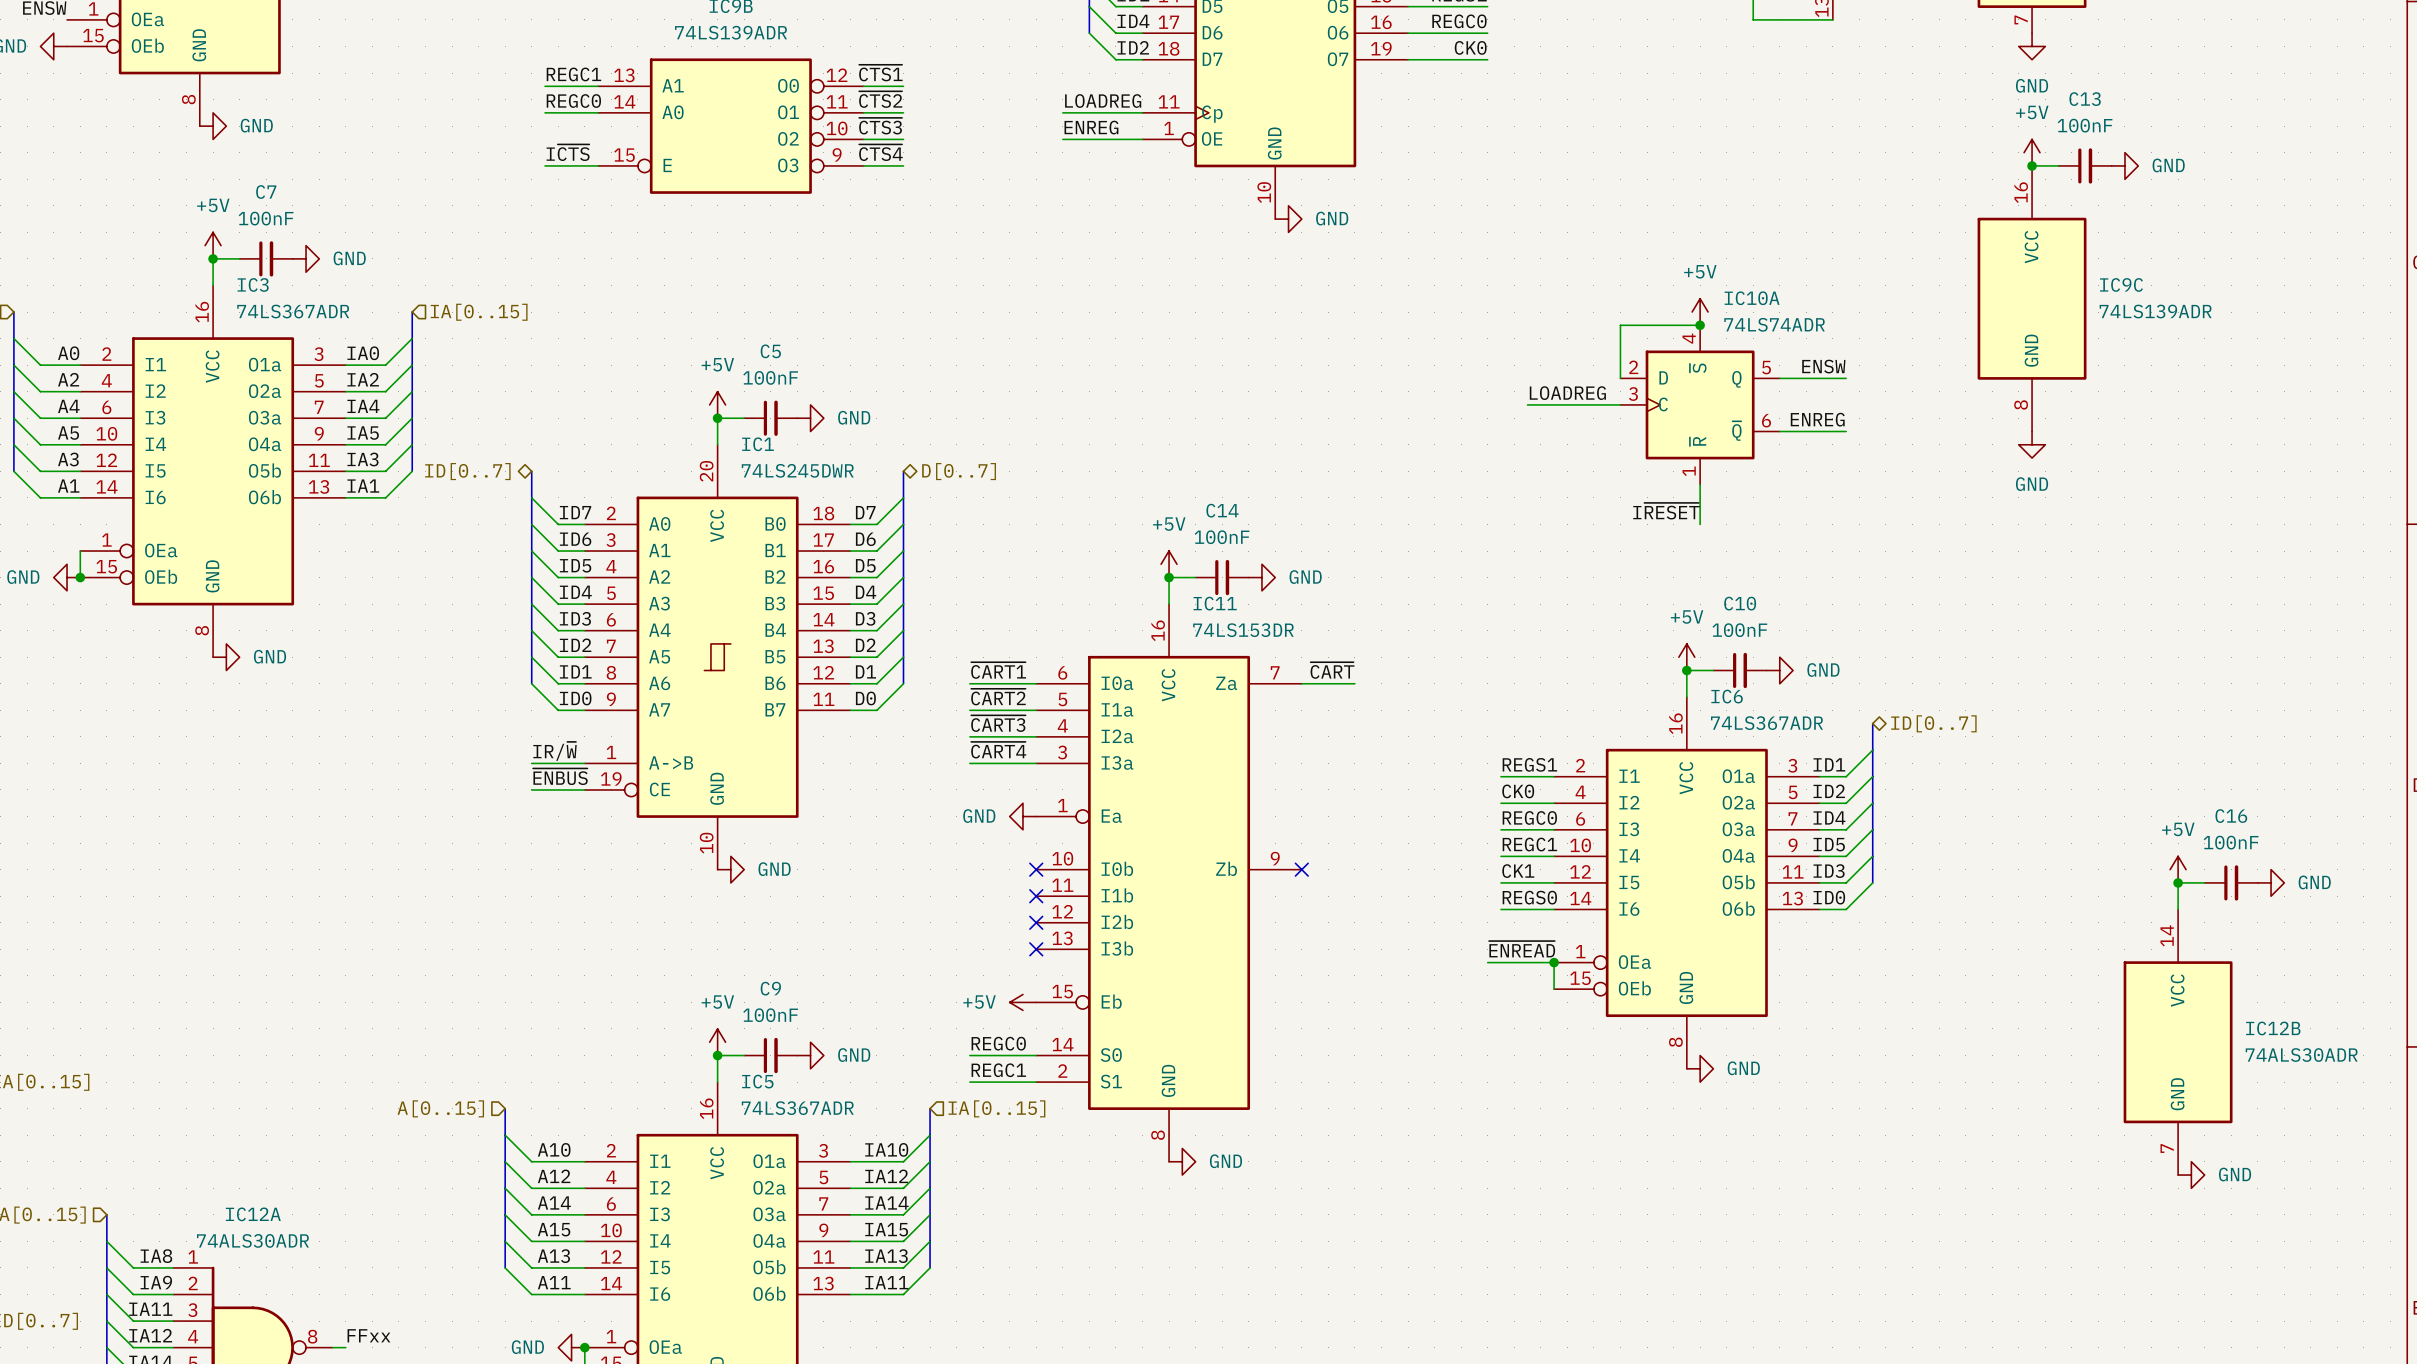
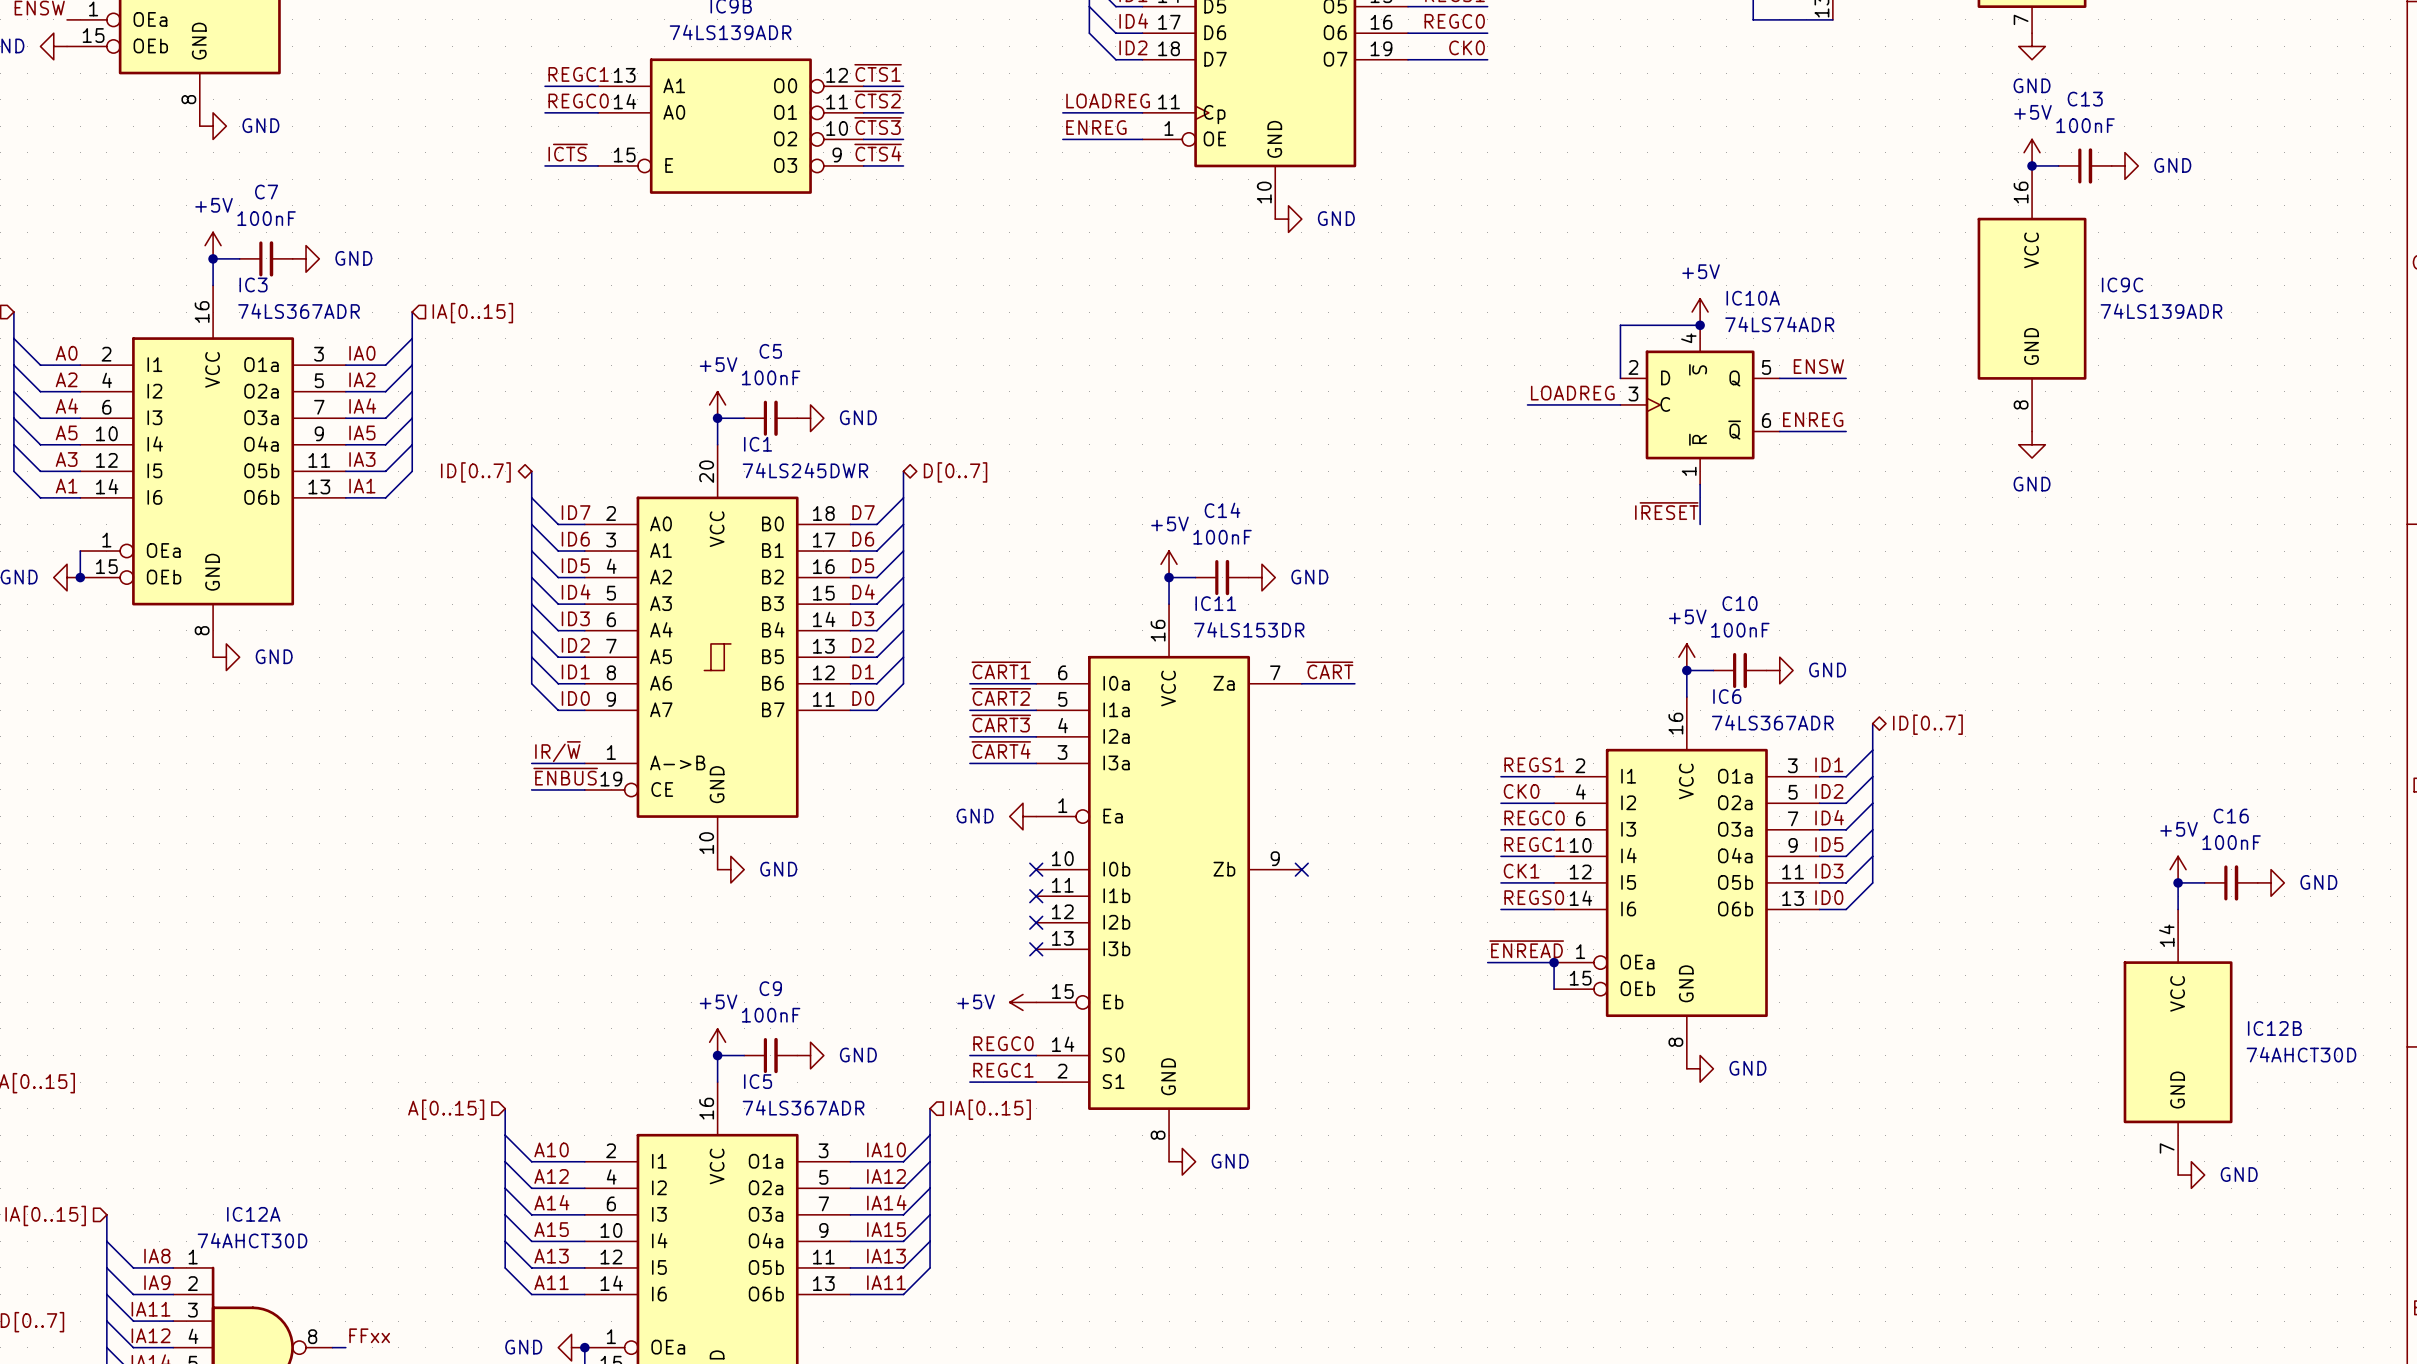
IC12B value: 74ALS30ADR (2301, 1055) -> 74AHCT30D (2301, 1054)
IC12A value: 74ALS30ADR (252, 1240) -> 74AHCT30D (252, 1240)

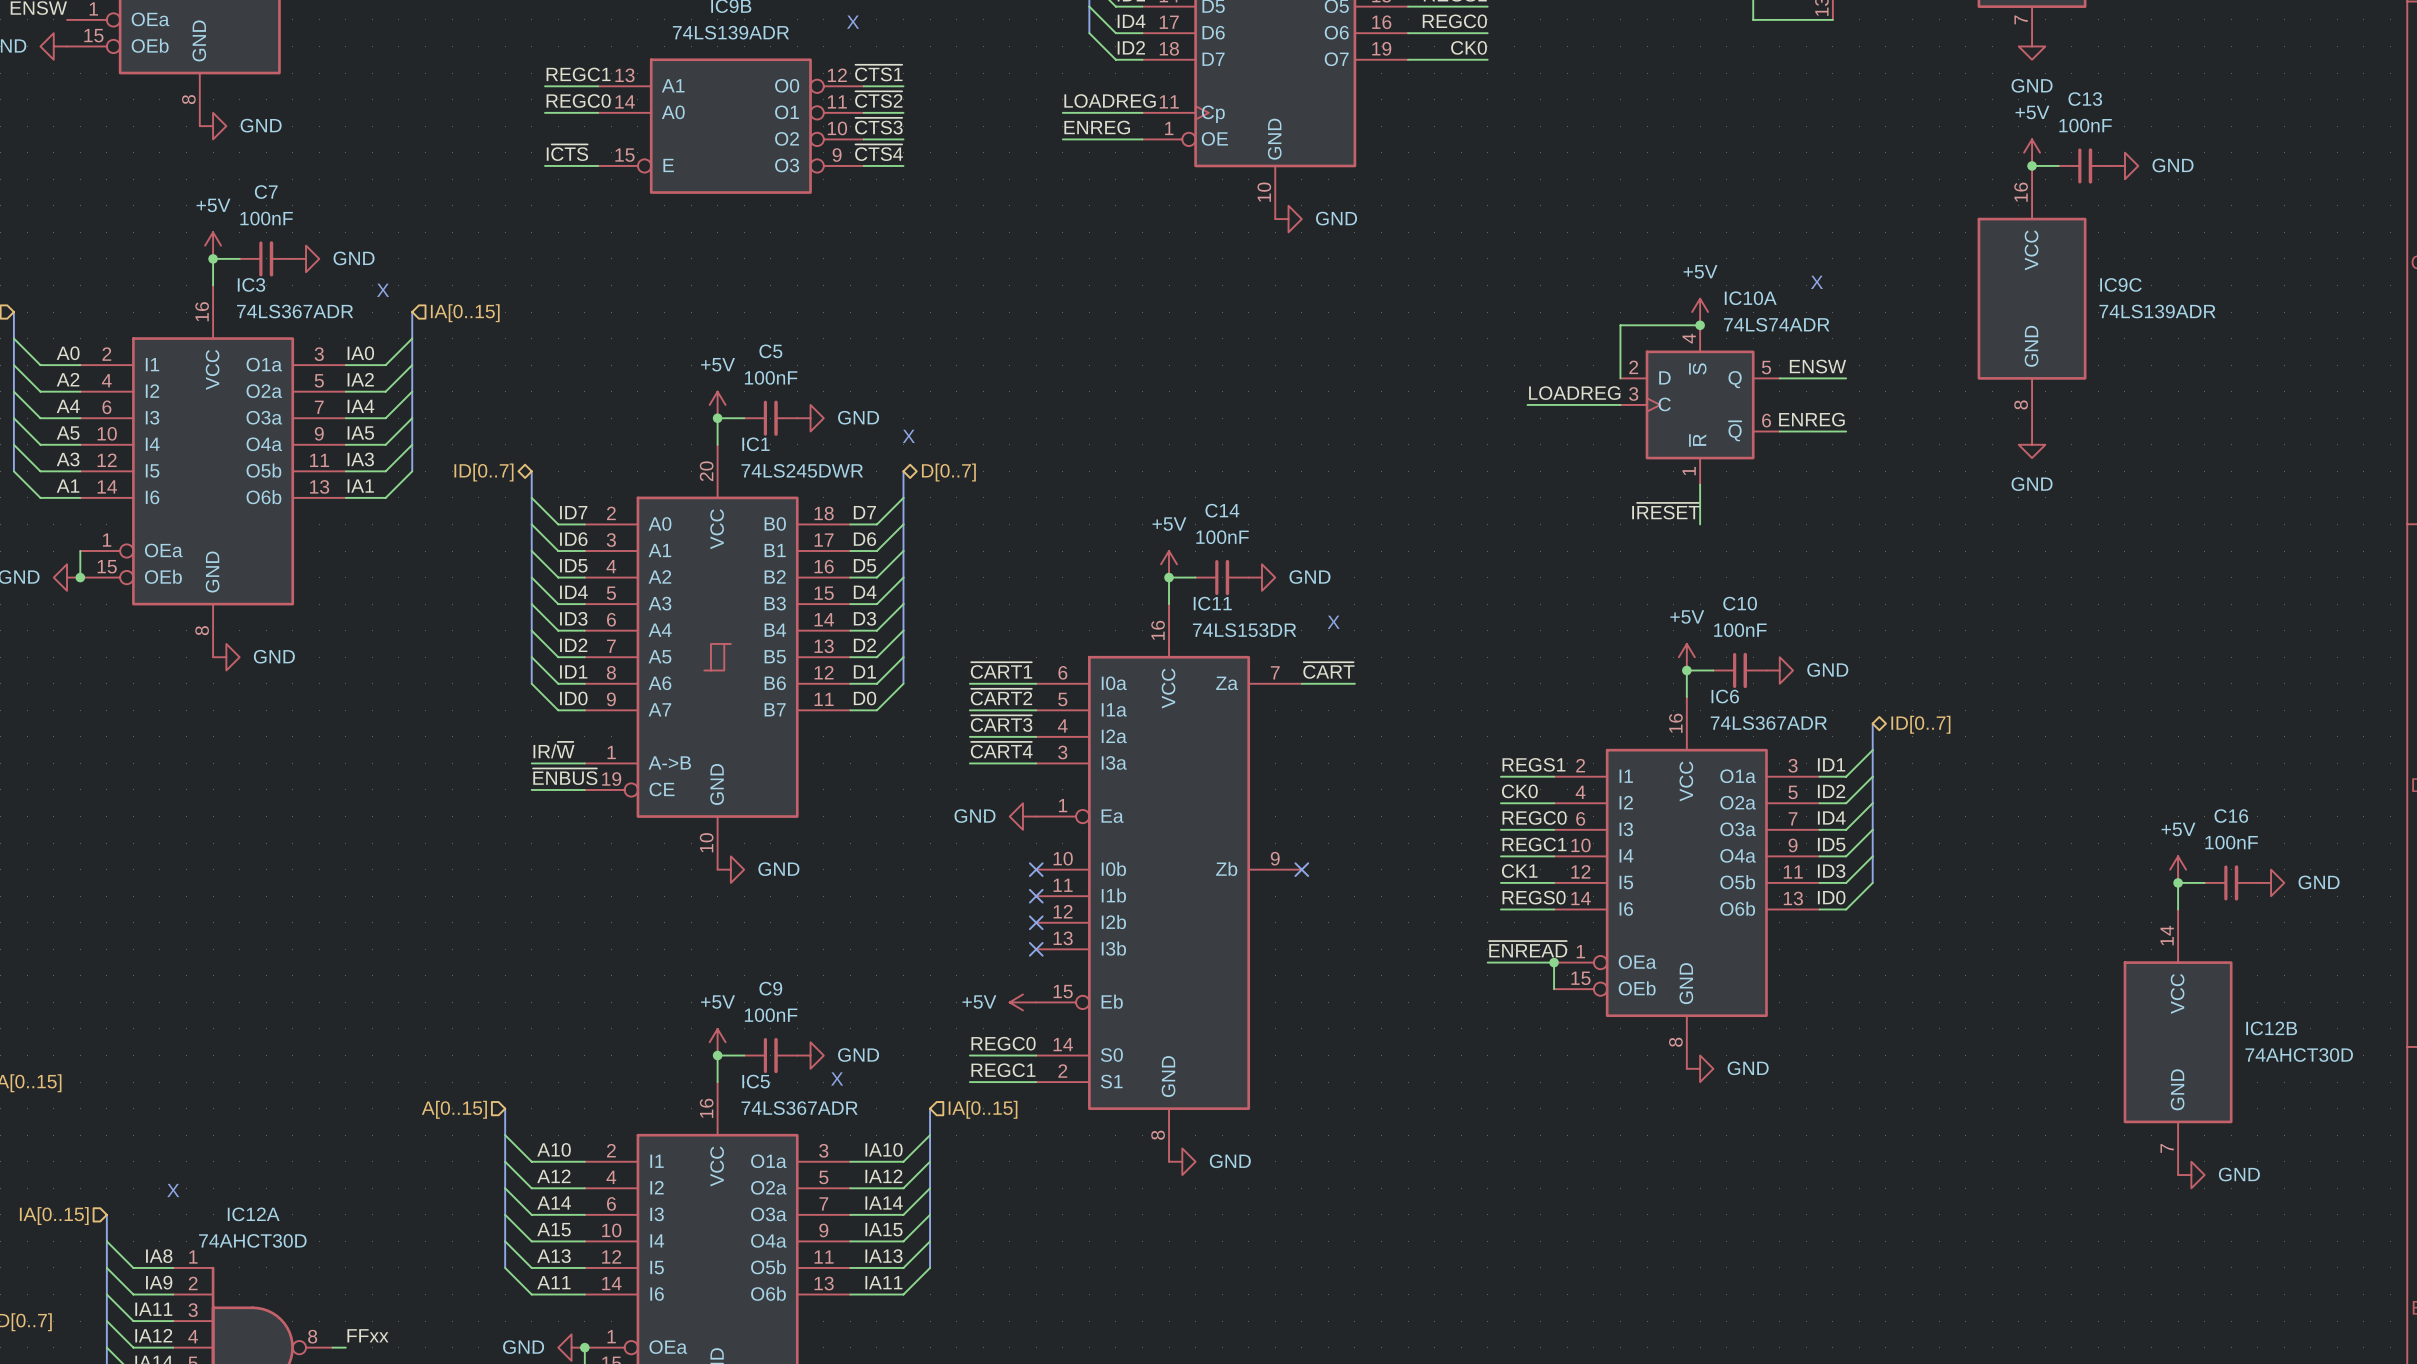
text: none -> X (853, 22)
text: none -> X (1816, 282)
text: none -> X (383, 290)
text: none -> X (908, 436)
text: none -> X (1333, 622)
text: none -> X (837, 1078)
text: none -> X (173, 1190)

